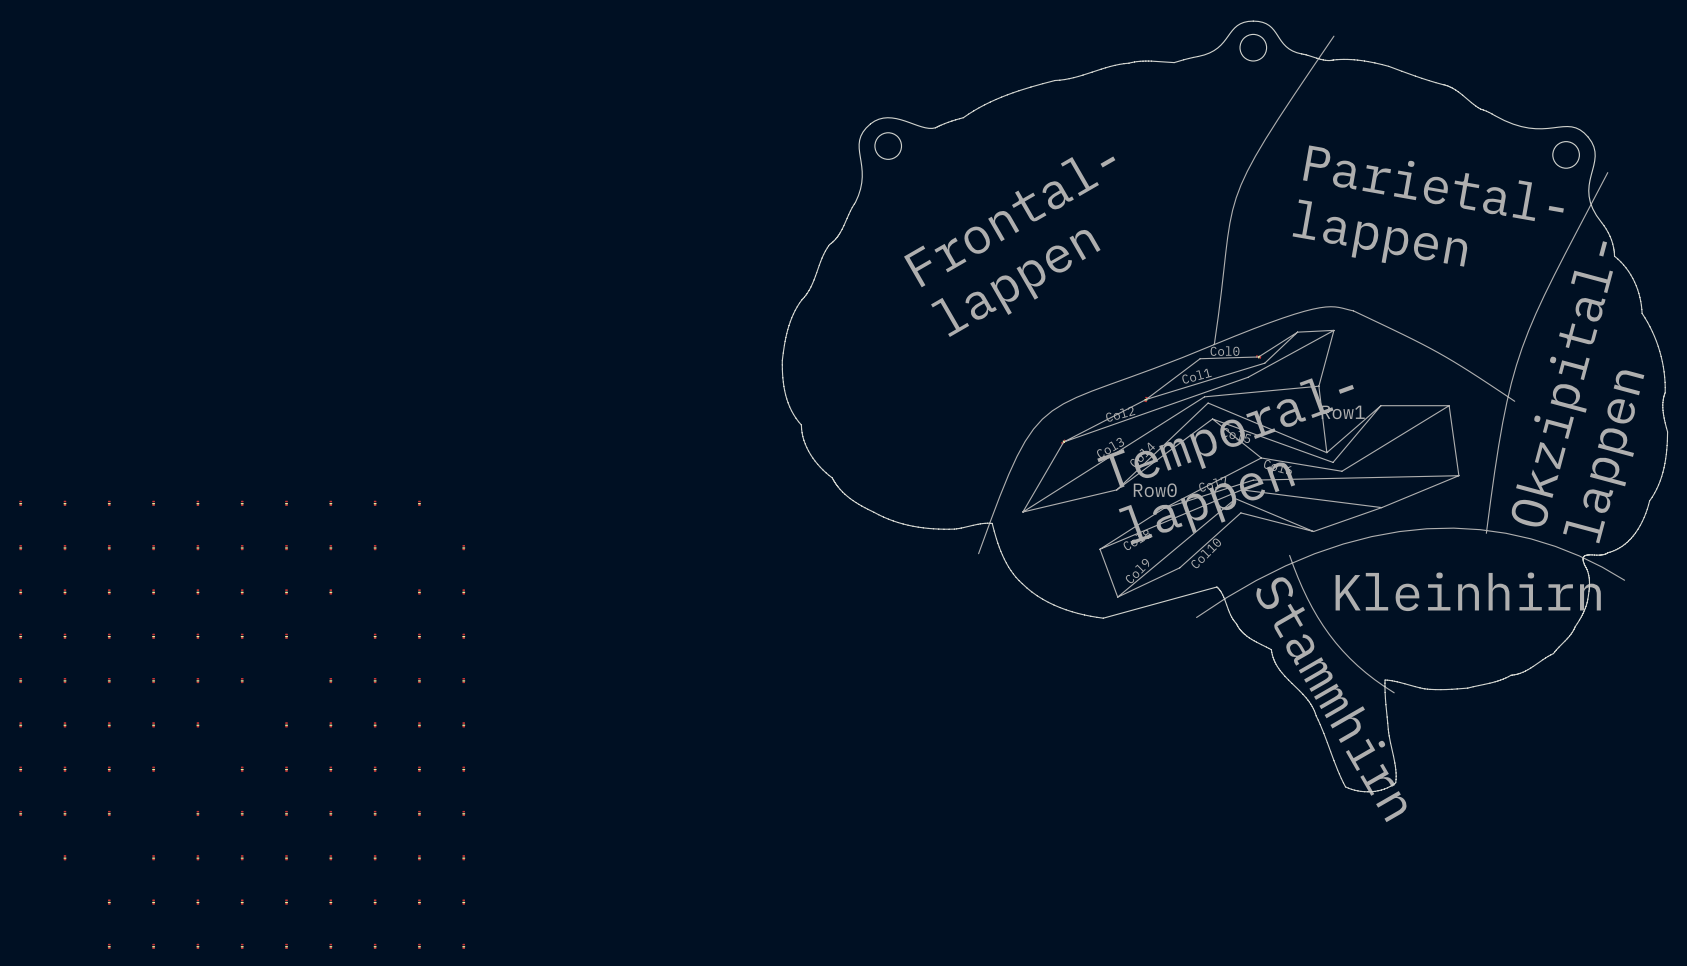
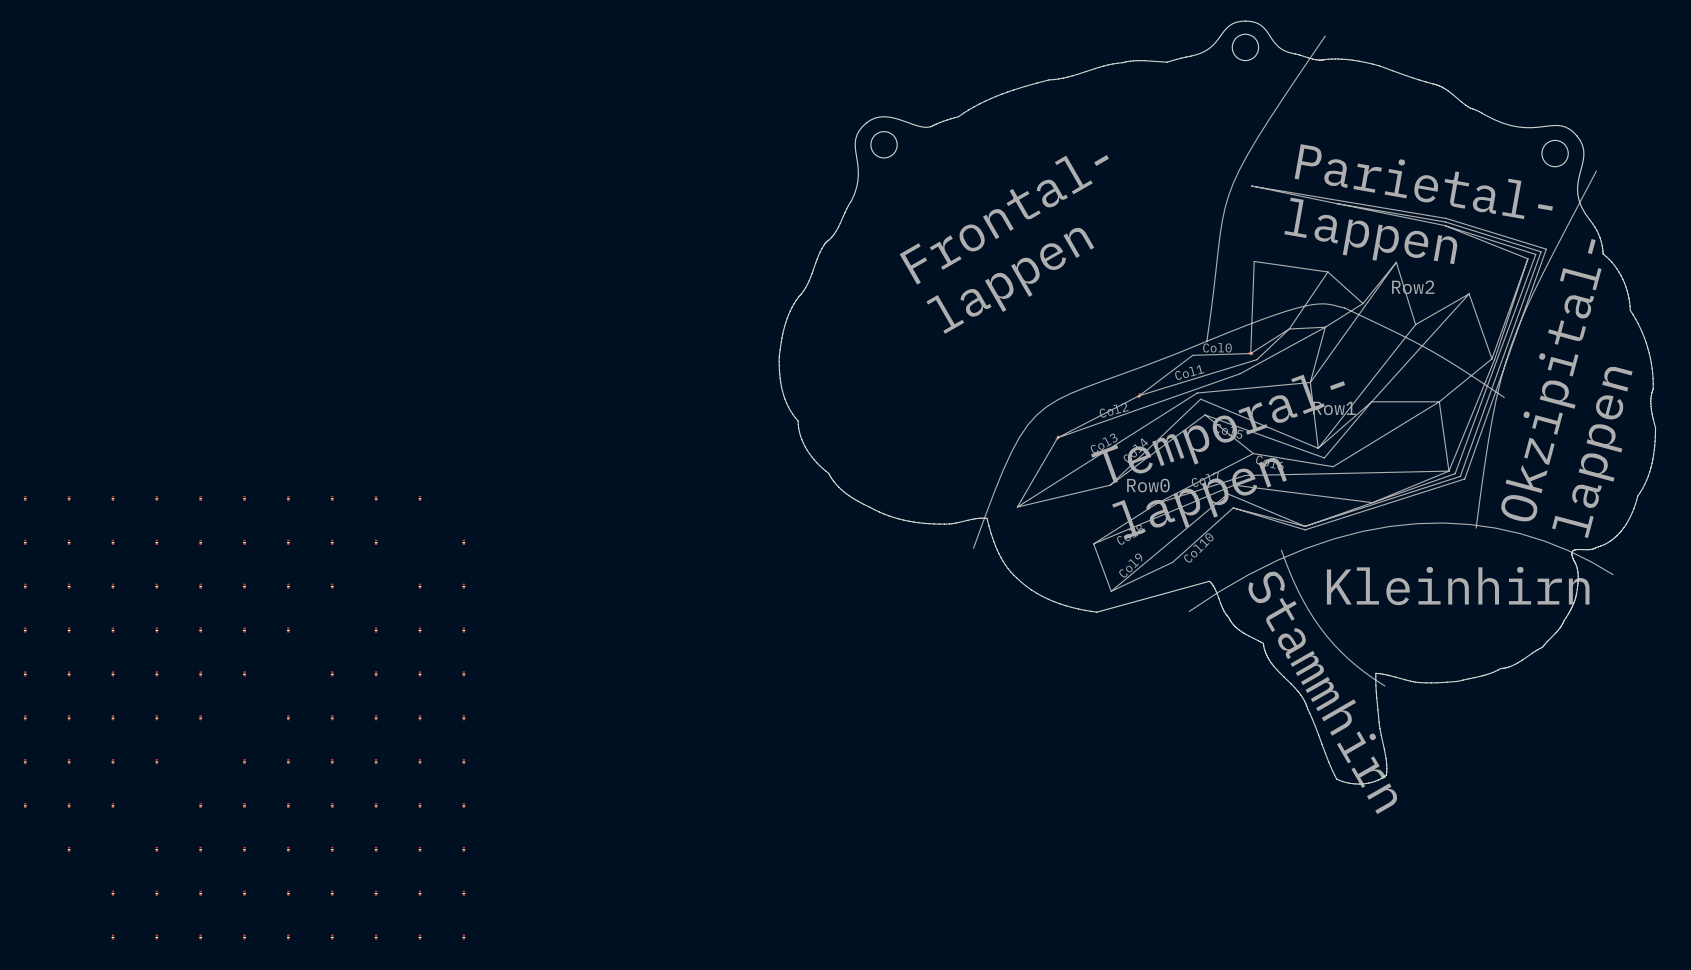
line: none -> (1336, 203) (1251, 186) (1446, 218) (1546, 249) (1464, 479) (1305, 529) (1233, 507)
line: none -> (1336, 203) (1444, 225)
line: none -> (1336, 203) (1445, 221) (1541, 251) (1460, 476) (1305, 526)
line: none -> (1444, 225) (1527, 258)
line: none -> (1444, 225) (1535, 254) (1455, 473) (1372, 502)
line: none -> (1527, 258) (1491, 358)
line: none -> (1527, 258) (1494, 359) (1448, 471)
line: none -> (1396, 262) (1362, 303)
line: none -> (1396, 262) (1415, 324)
line: none -> (1396, 262) (1310, 382)
line: none -> (1327, 271) (1254, 261) (1250, 353)
line: none -> (1327, 271) (1362, 303)
line: none -> (1327, 271) (1289, 329)
text: none -> Row2 (1413, 287)
line: none -> (1469, 293) (1415, 324)
line: none -> (1469, 293) (1491, 358)
line: none -> (1469, 293) (1371, 401)
line: none -> (1362, 303) (1325, 327)
line: none -> (1415, 324) (1318, 448)
line: none -> (1491, 358) (1439, 401)

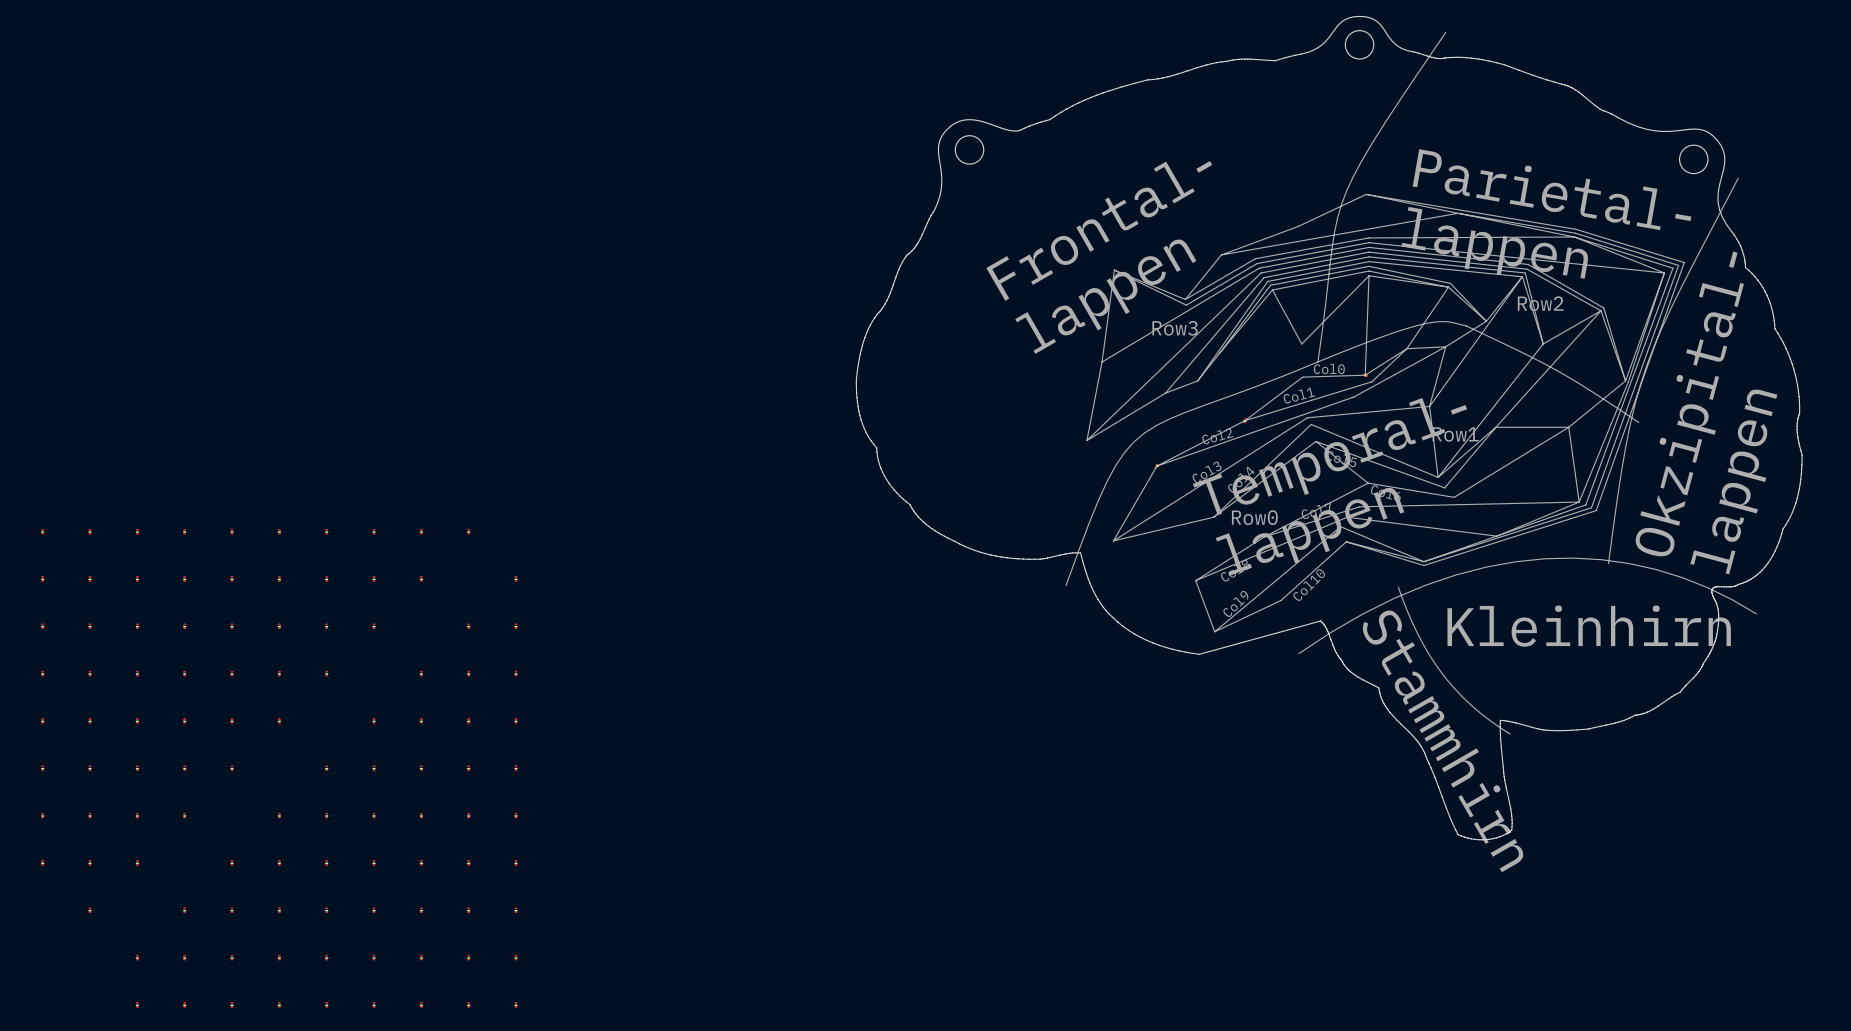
line: none -> (1366, 194) (1298, 226) (1221, 254)
line: none -> (1458, 213) (1221, 254)
line: none -> (1574, 237) (1369, 237) (1255, 258) (1185, 299)
line: none -> (1221, 254) (1185, 299)
line: none -> (1114, 270) (1102, 361)
line: none -> (1114, 270) (1185, 299)
line: none -> (1114, 270) (1186, 305) (1257, 263) (1369, 242) (1664, 272)
line: none -> (1369, 275) (1301, 343) (1272, 290)
line: none -> (1522, 276) (1369, 261) (1267, 281) (1197, 380)
line: none -> (1448, 287) (1369, 271) (1272, 290)
line: none -> (1272, 290) (1219, 353)
line: none -> (1600, 310) (1527, 269) (1369, 252) (1261, 272) (1086, 440)
line: none -> (1486, 321) (1450, 283) (1369, 266) (1270, 285) (1219, 353)
text: none -> Row3 (1175, 328)
line: none -> (1543, 343) (1525, 272) (1369, 256) (1263, 277) (1165, 393)
line: none -> (1219, 353) (1197, 380)
line: none -> (1102, 361) (1086, 440)
line: none -> (1102, 361) (1259, 268) (1369, 247) (1528, 264) (1603, 308) (1625, 380)
line: none -> (1197, 380) (1165, 393)
line: none -> (1165, 393) (1086, 440)

